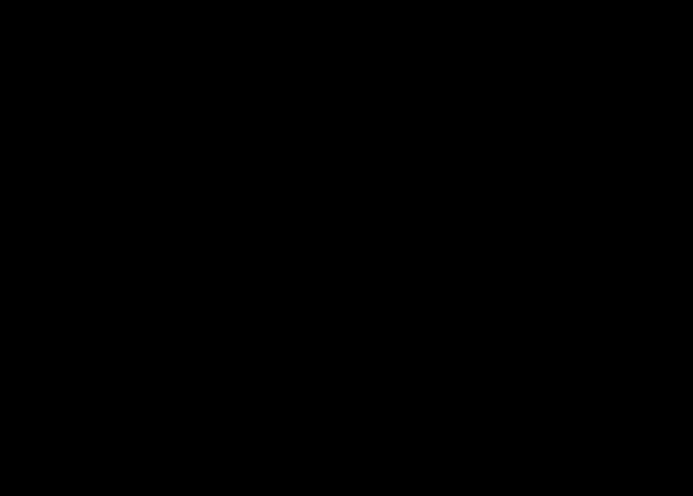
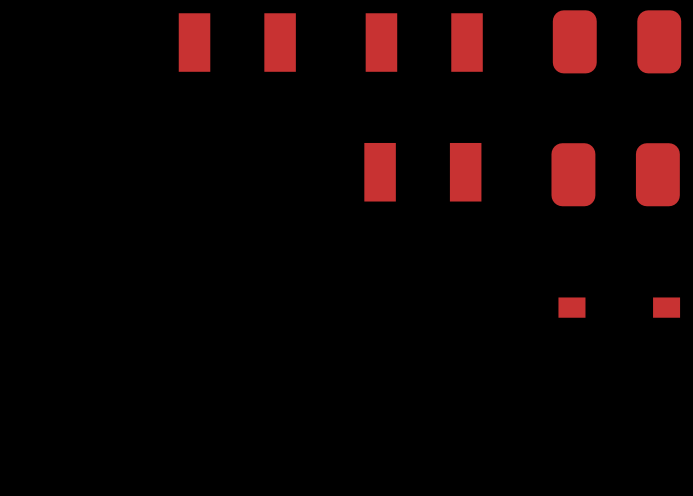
part: none -> (617, 41)
part: none -> (237, 42)
part: none -> (424, 42)
part: none -> (422, 172)
part: none -> (615, 174)
part: none -> (619, 307)

